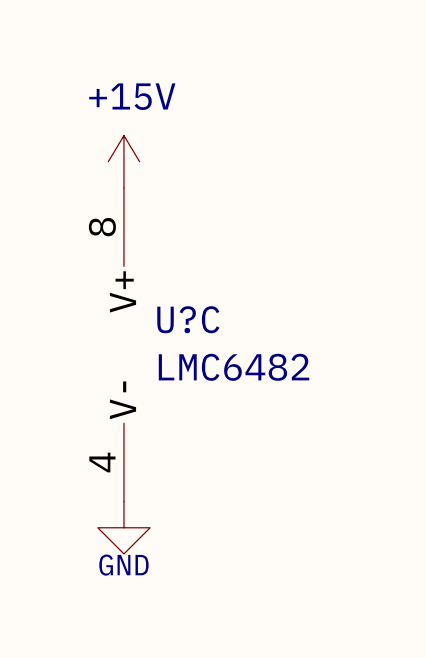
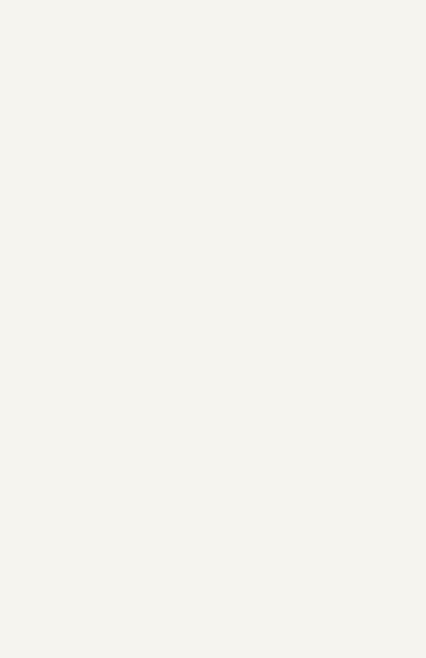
power symbol: +15V (123, 161) -> none
U?C: LMC6482 (123, 344) -> none
power symbol: GND (123, 527) -> none

